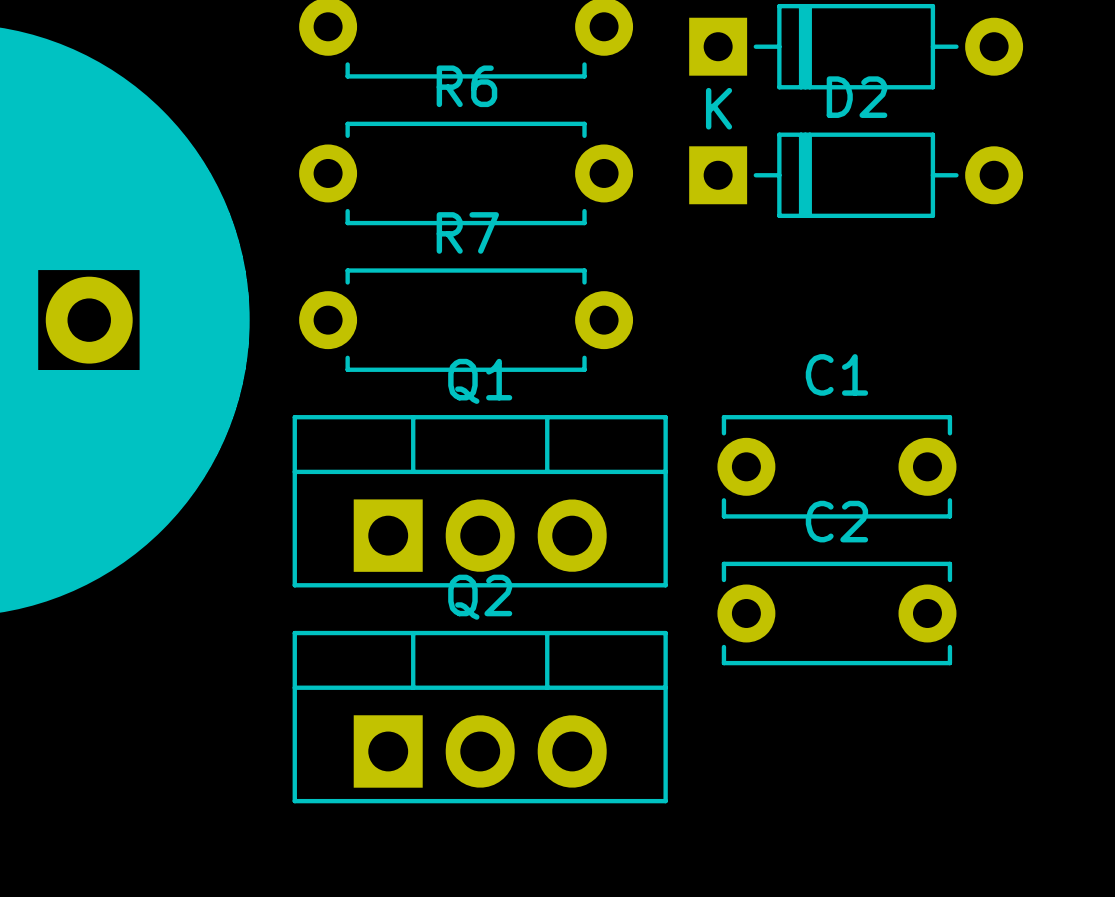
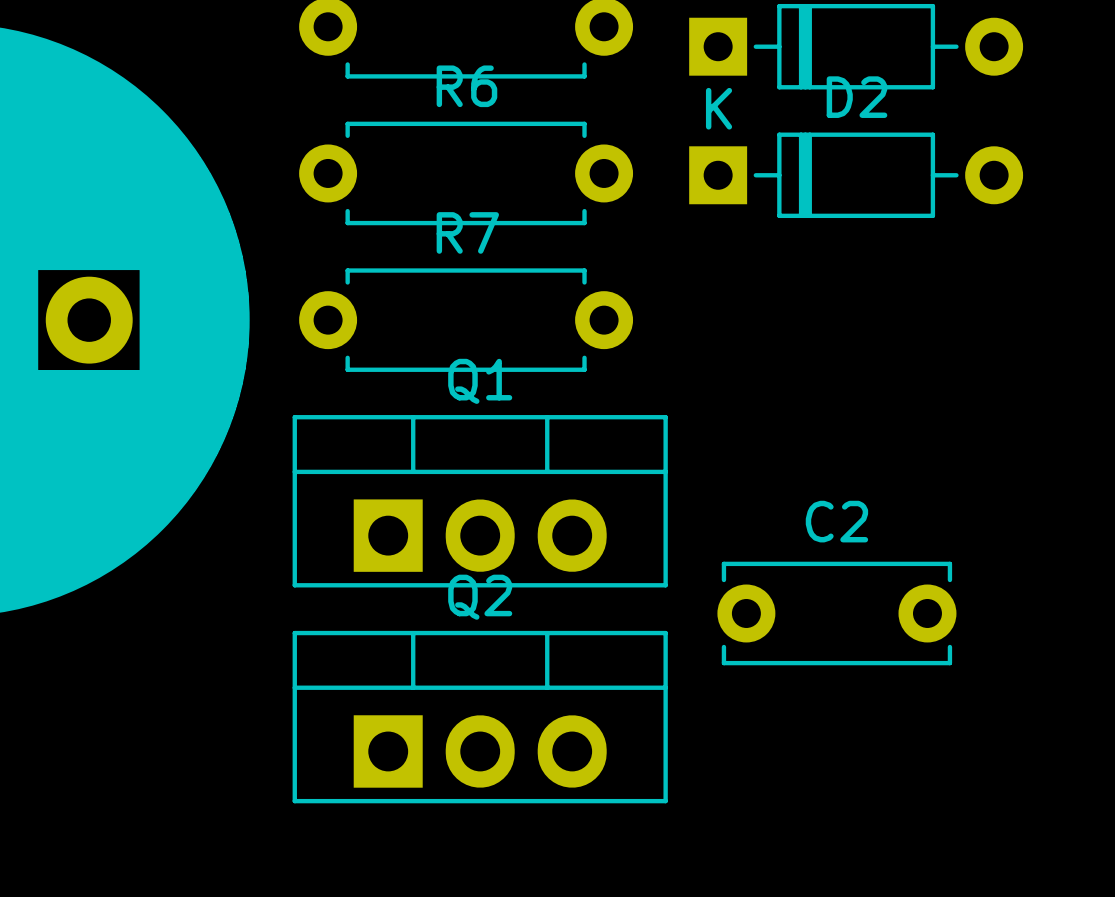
C1: (836, 466) -> none

